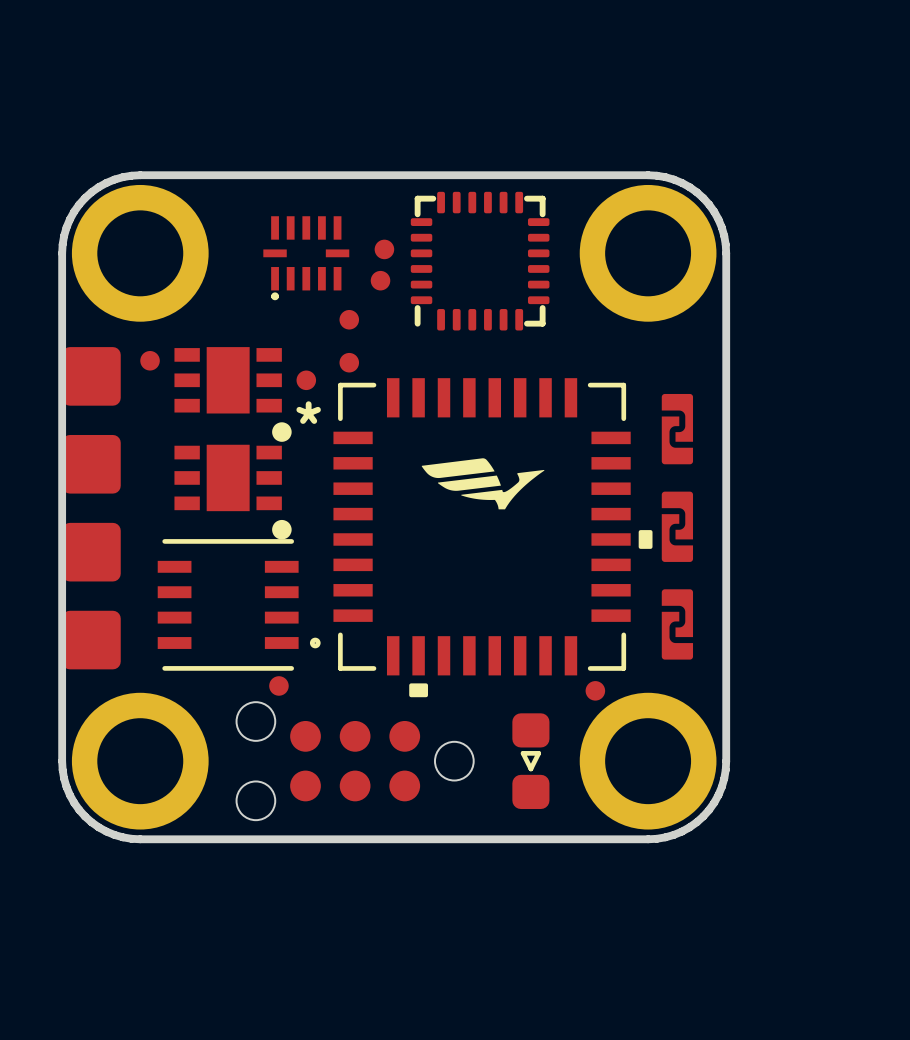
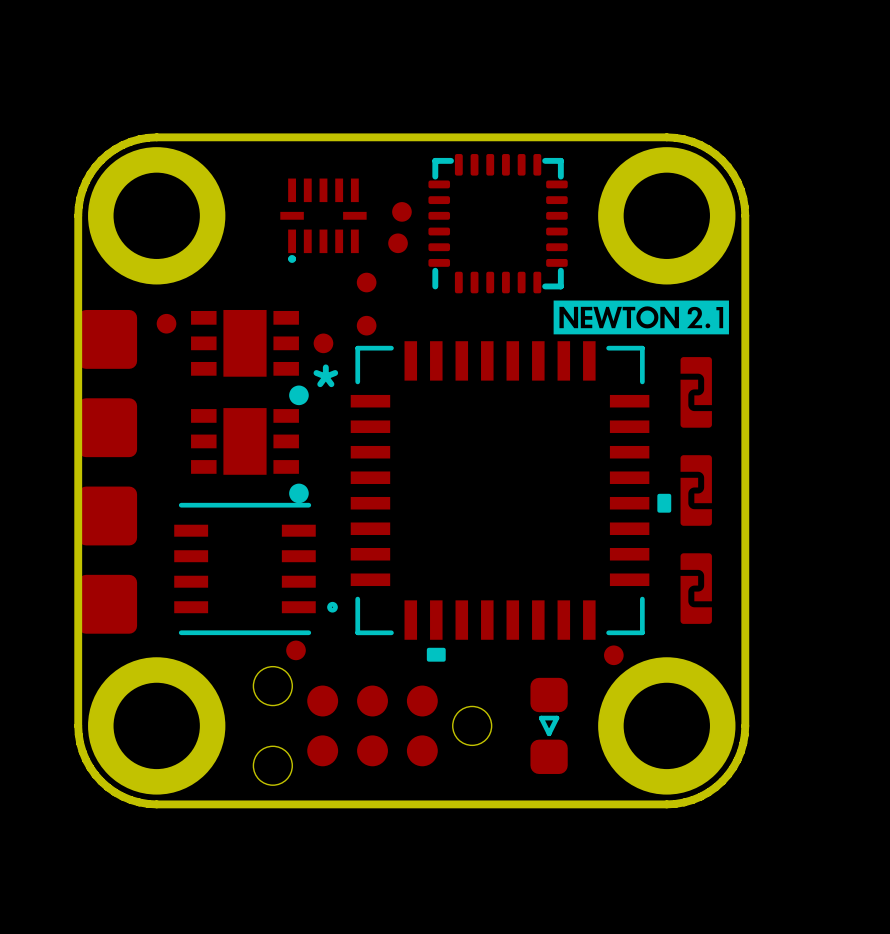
drawing: none -> [553, 300, 729, 335]
drawing: [421, 458, 545, 510] -> none

